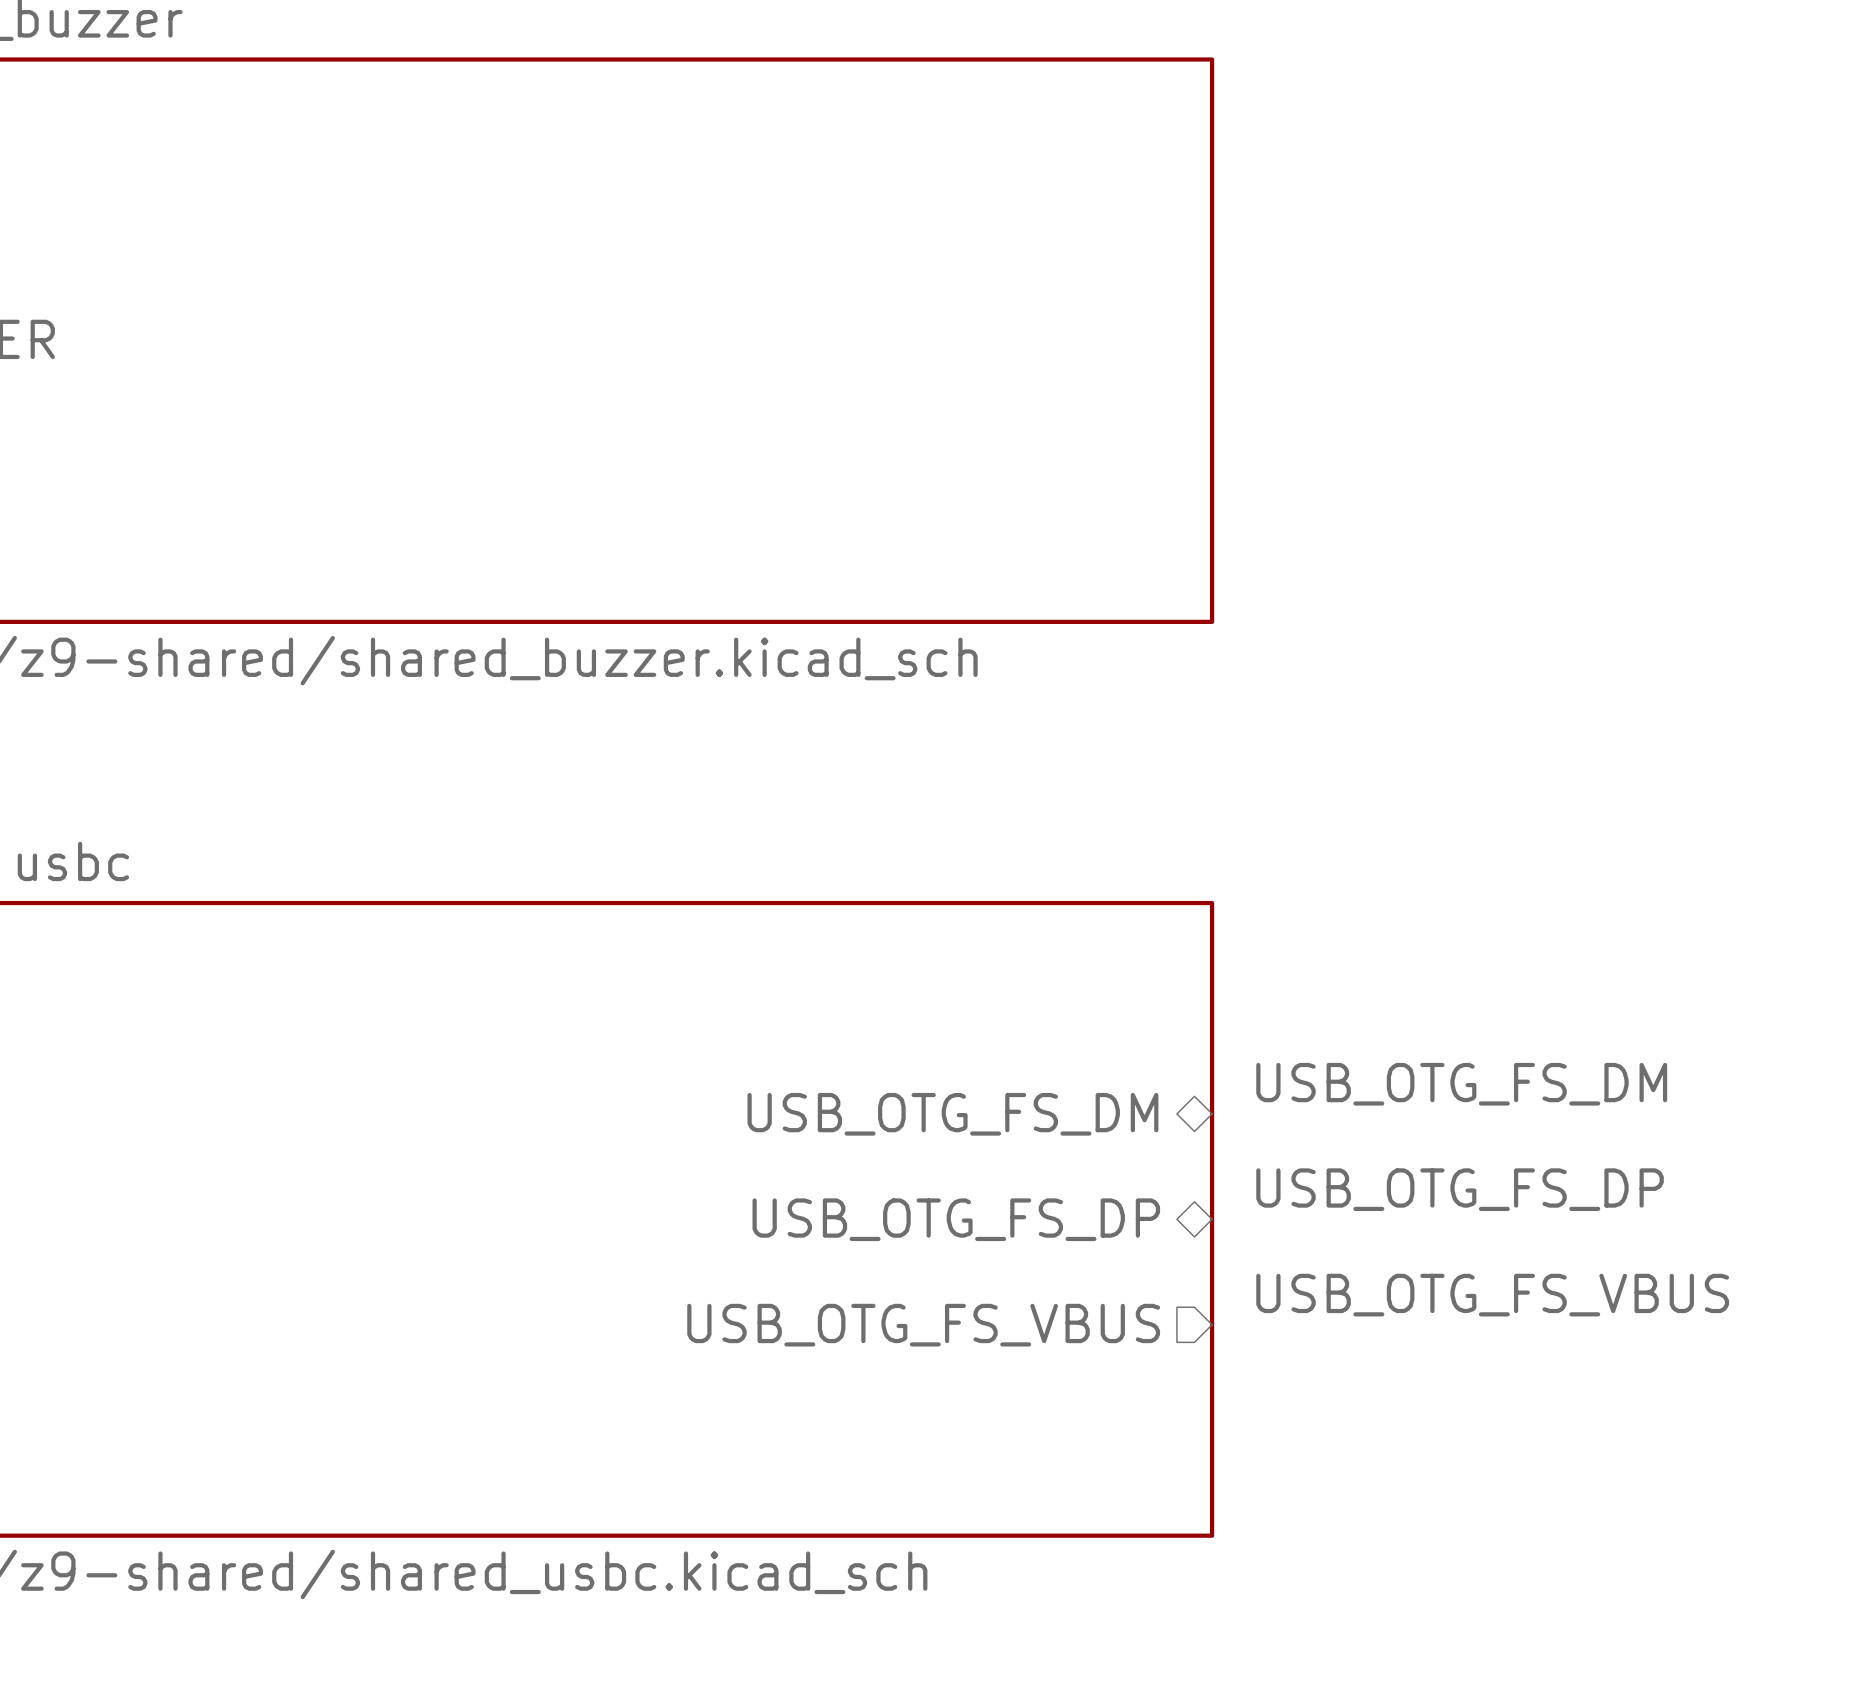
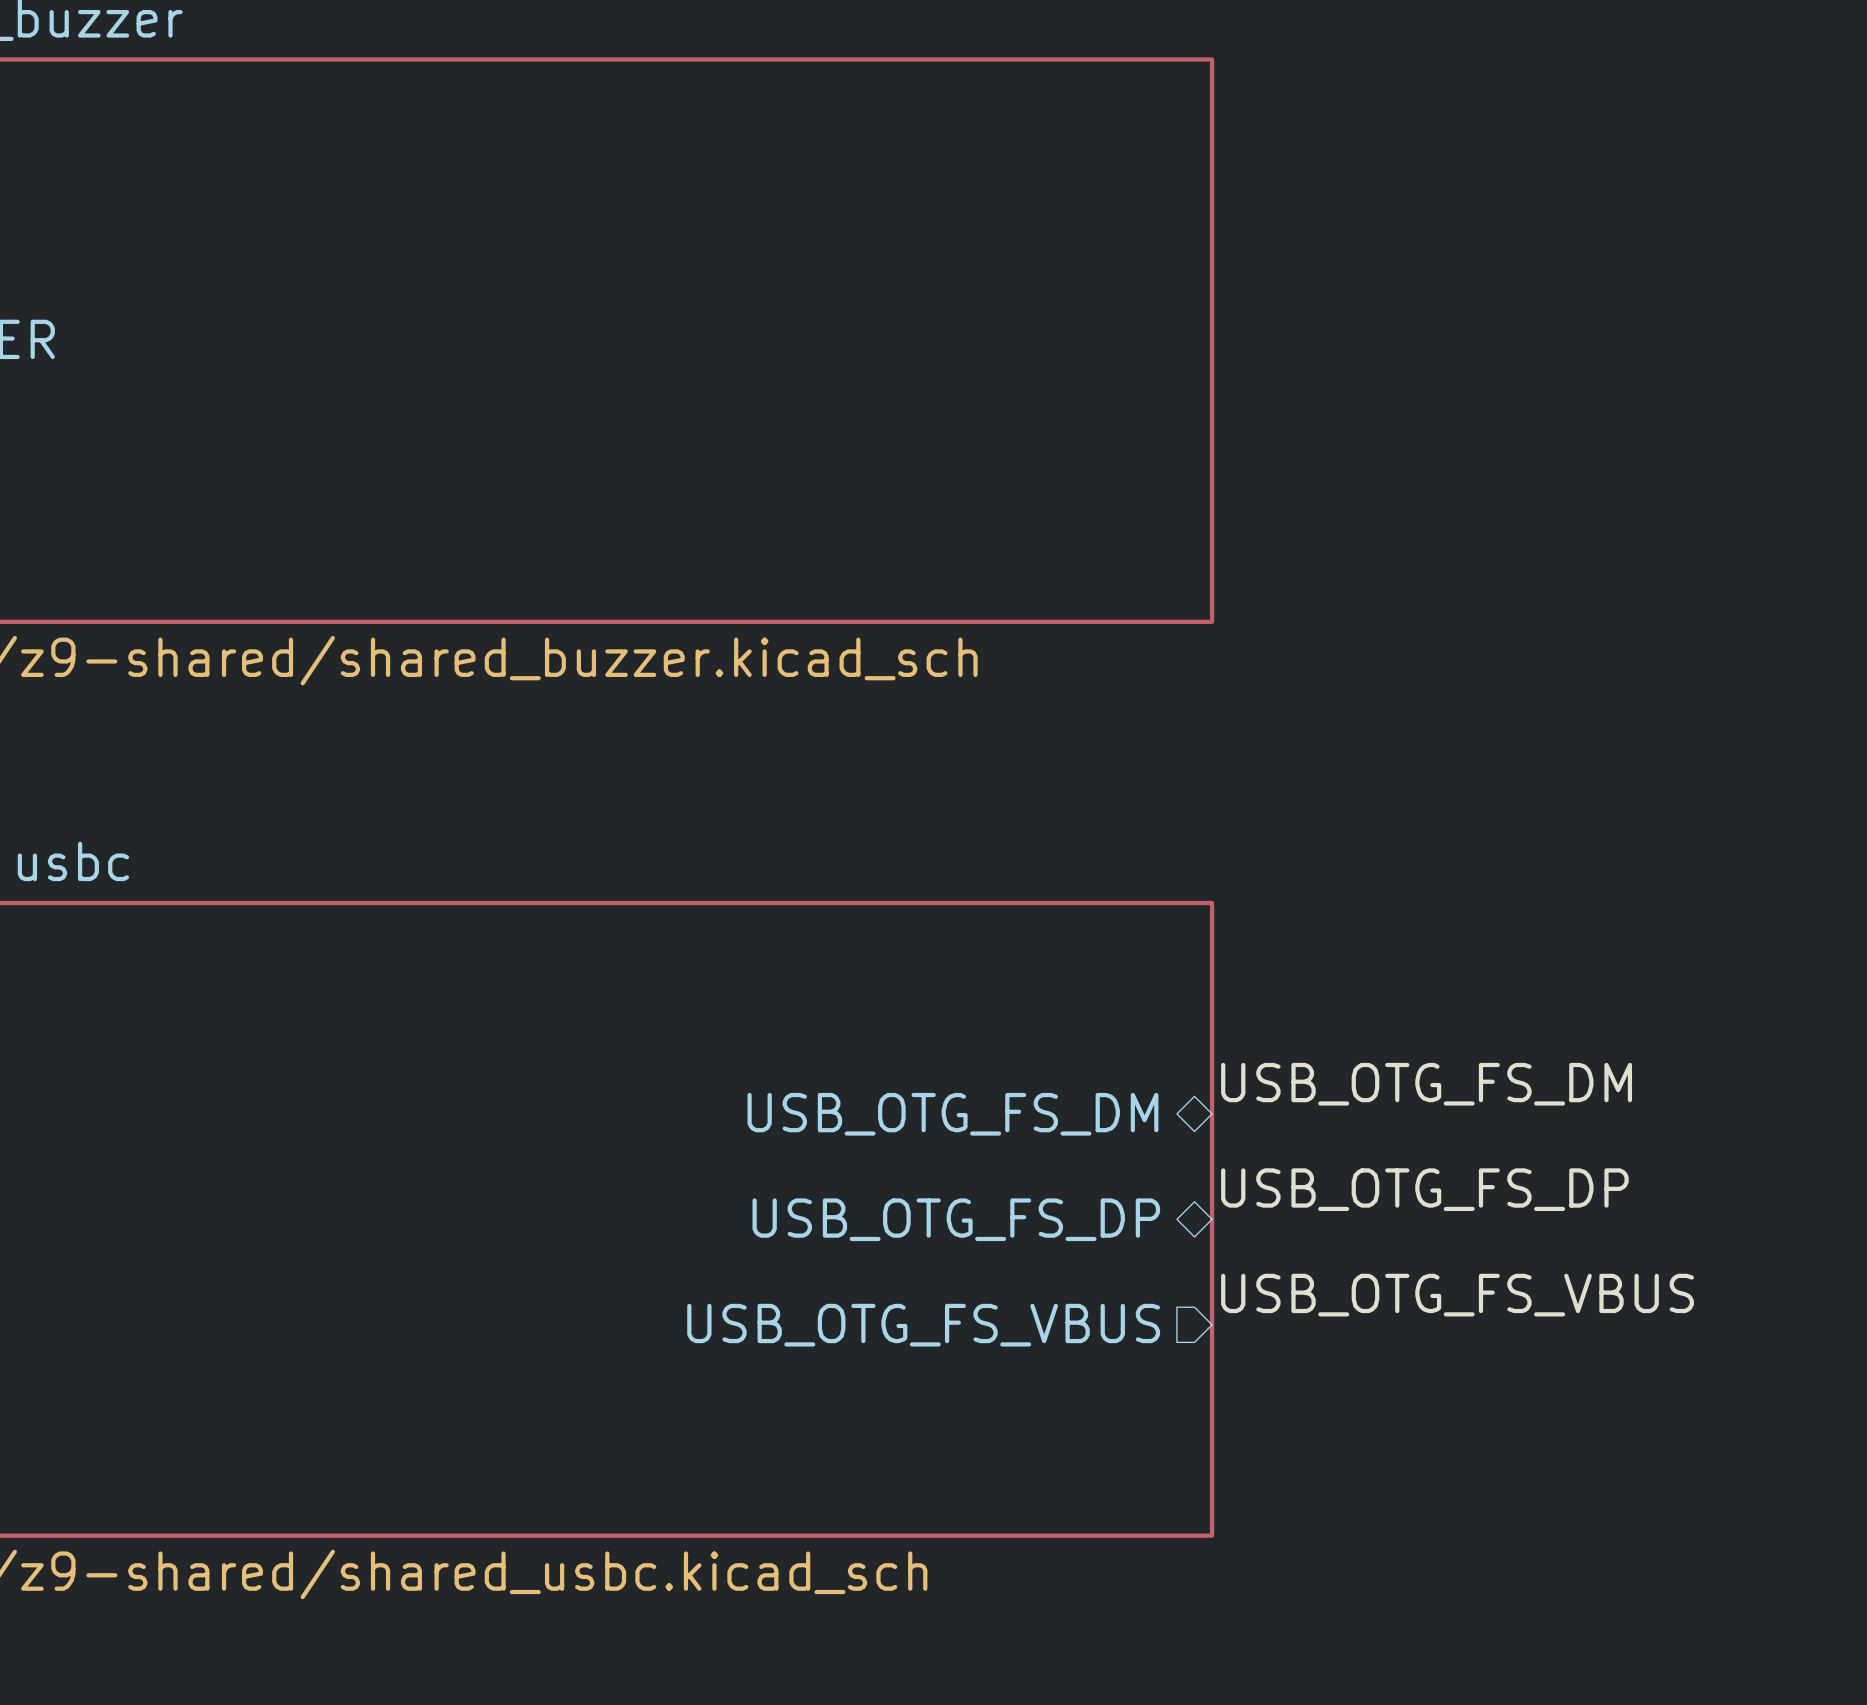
label position: USB_OTG_FS_DM (1461, 1084) -> USB_OTG_FS_DM (1426, 1084)
label position: USB_OTG_FS_DP (1460, 1189) -> USB_OTG_FS_DP (1424, 1189)
label position: USB_OTG_FS_VBUS (1492, 1295) -> USB_OTG_FS_VBUS (1457, 1295)

